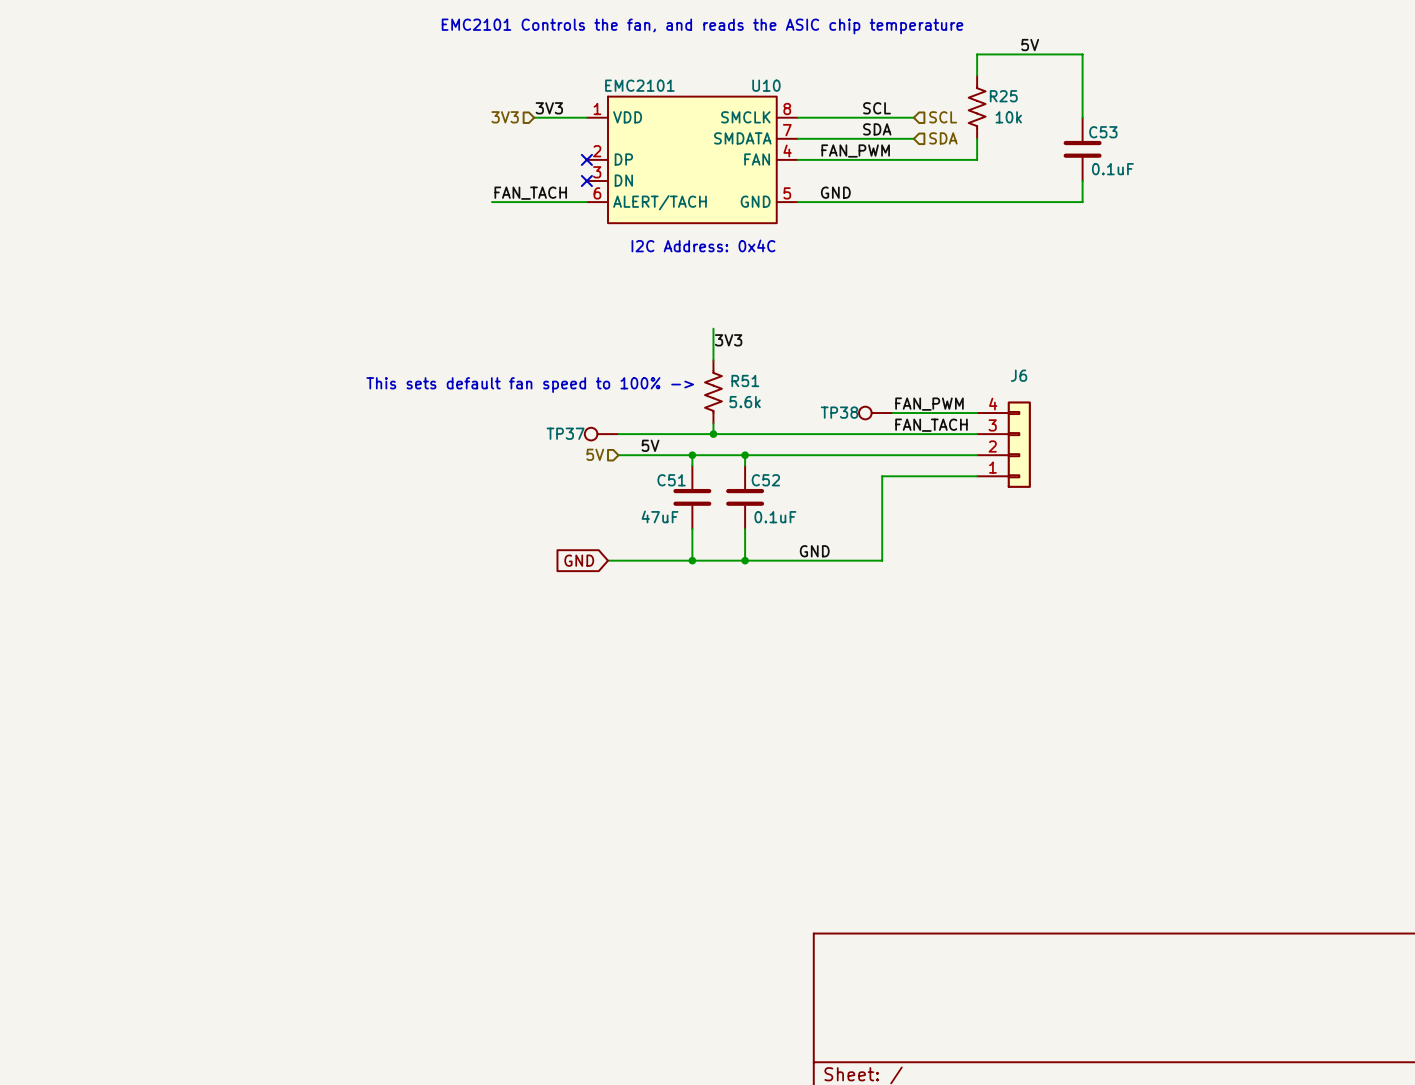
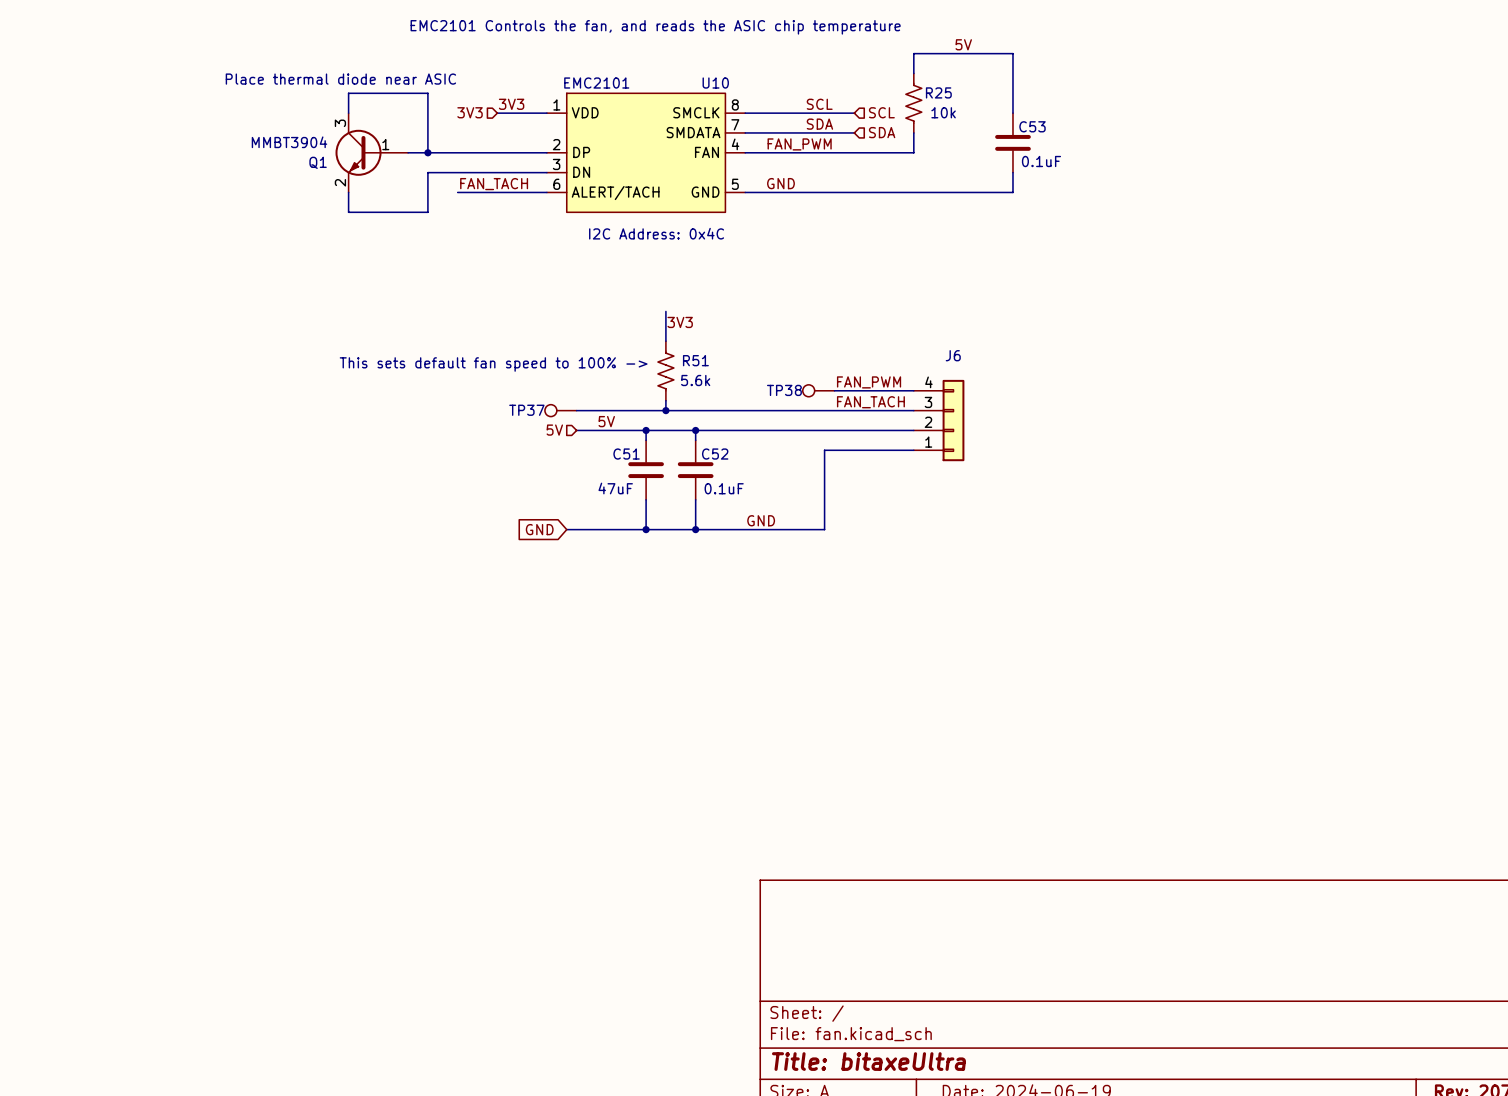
text: none -> Place thermal diode near ASIC (340, 79)
wire: none -> (348, 113) (348, 93) (427, 93) (427, 152)
Q1: none -> MMBT3904 (371, 152)
wire: none -> (408, 152) (546, 152)
junction: none -> (427, 152)
no-connect mark: (586, 159) -> none
wire: none -> (546, 172) (427, 172) (427, 212) (348, 212) (348, 192)
no-connect mark: (586, 180) -> none

